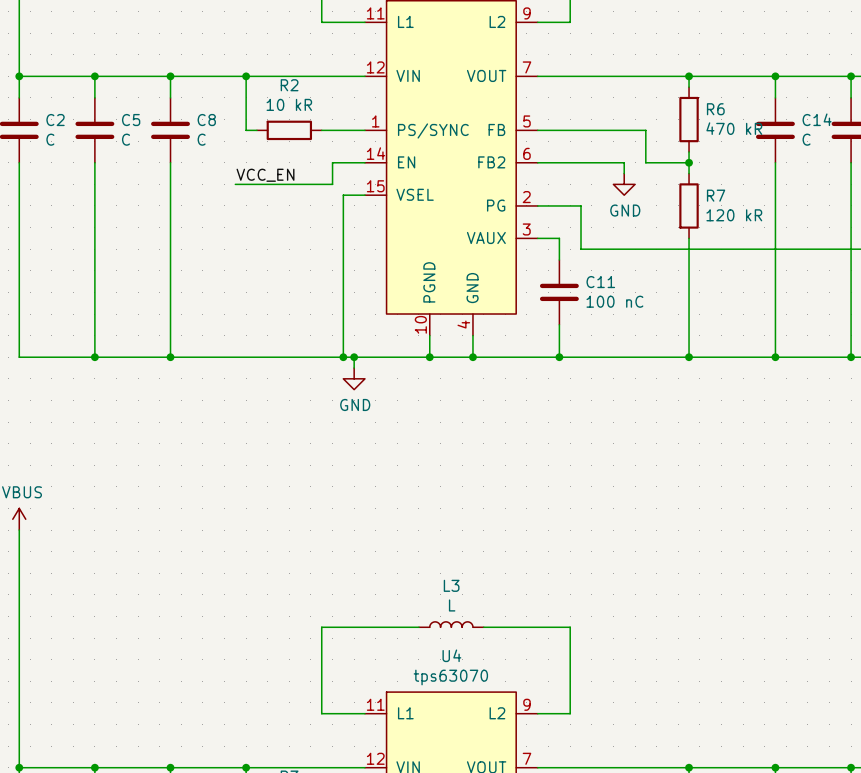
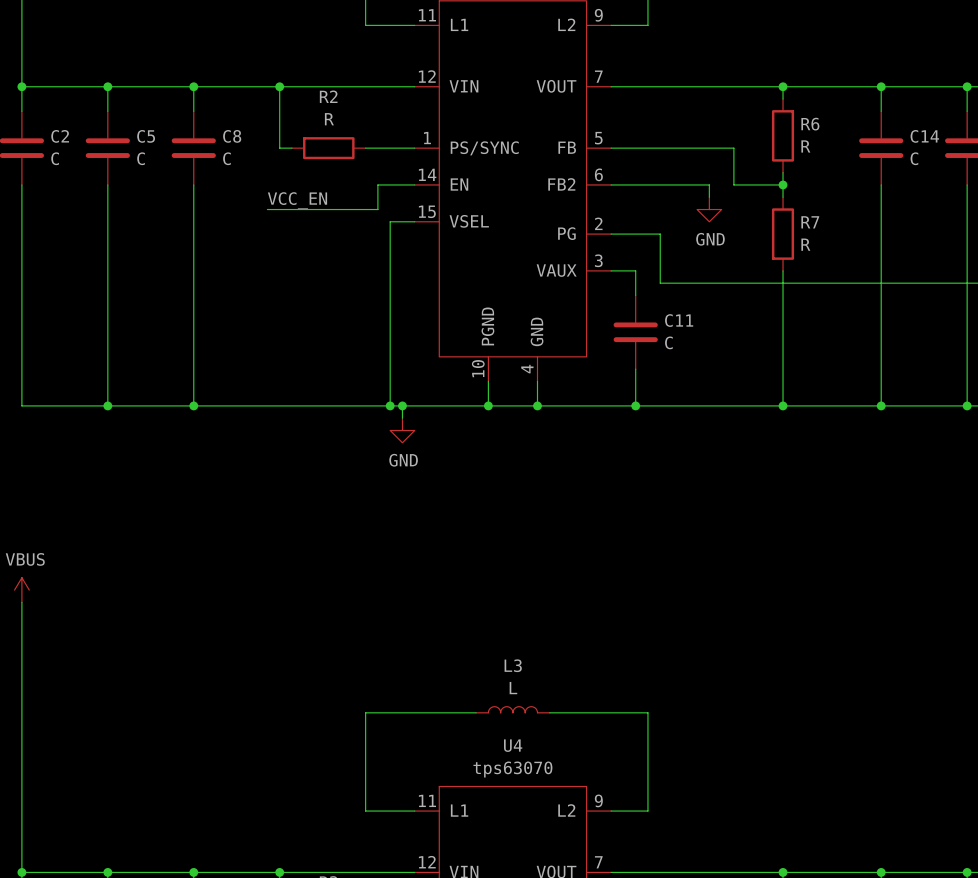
R2 value: 10 kR (289, 104) -> R (329, 119)
R6 value: 470 kR (734, 128) -> R (805, 146)
R7 value: 120 kR (734, 215) -> R (805, 244)
C11 value: 100 nC (614, 301) -> C (668, 342)

